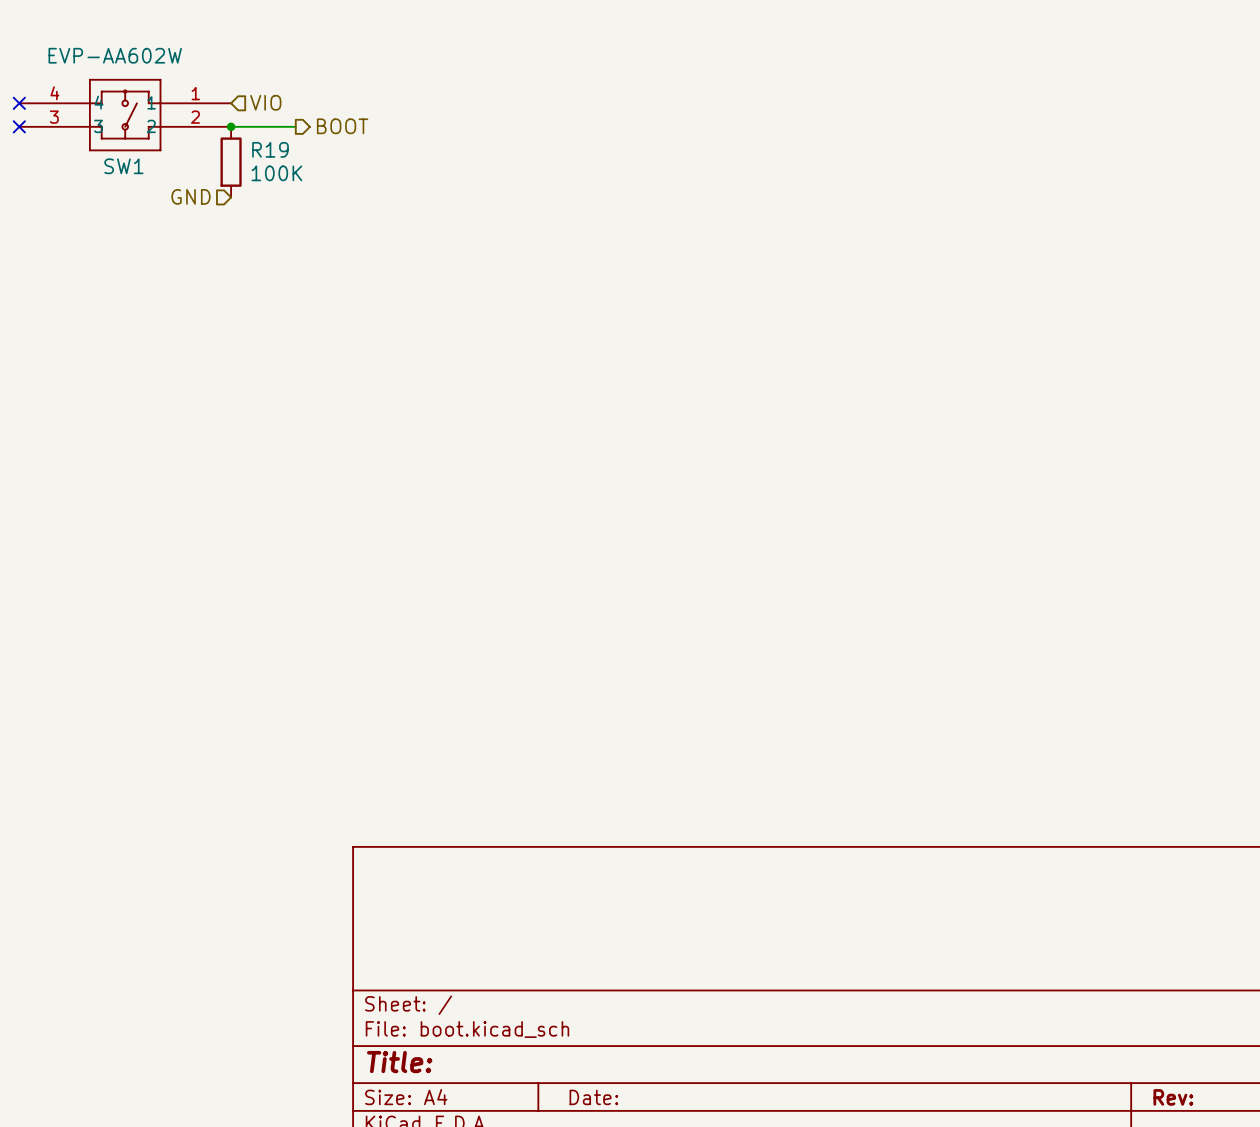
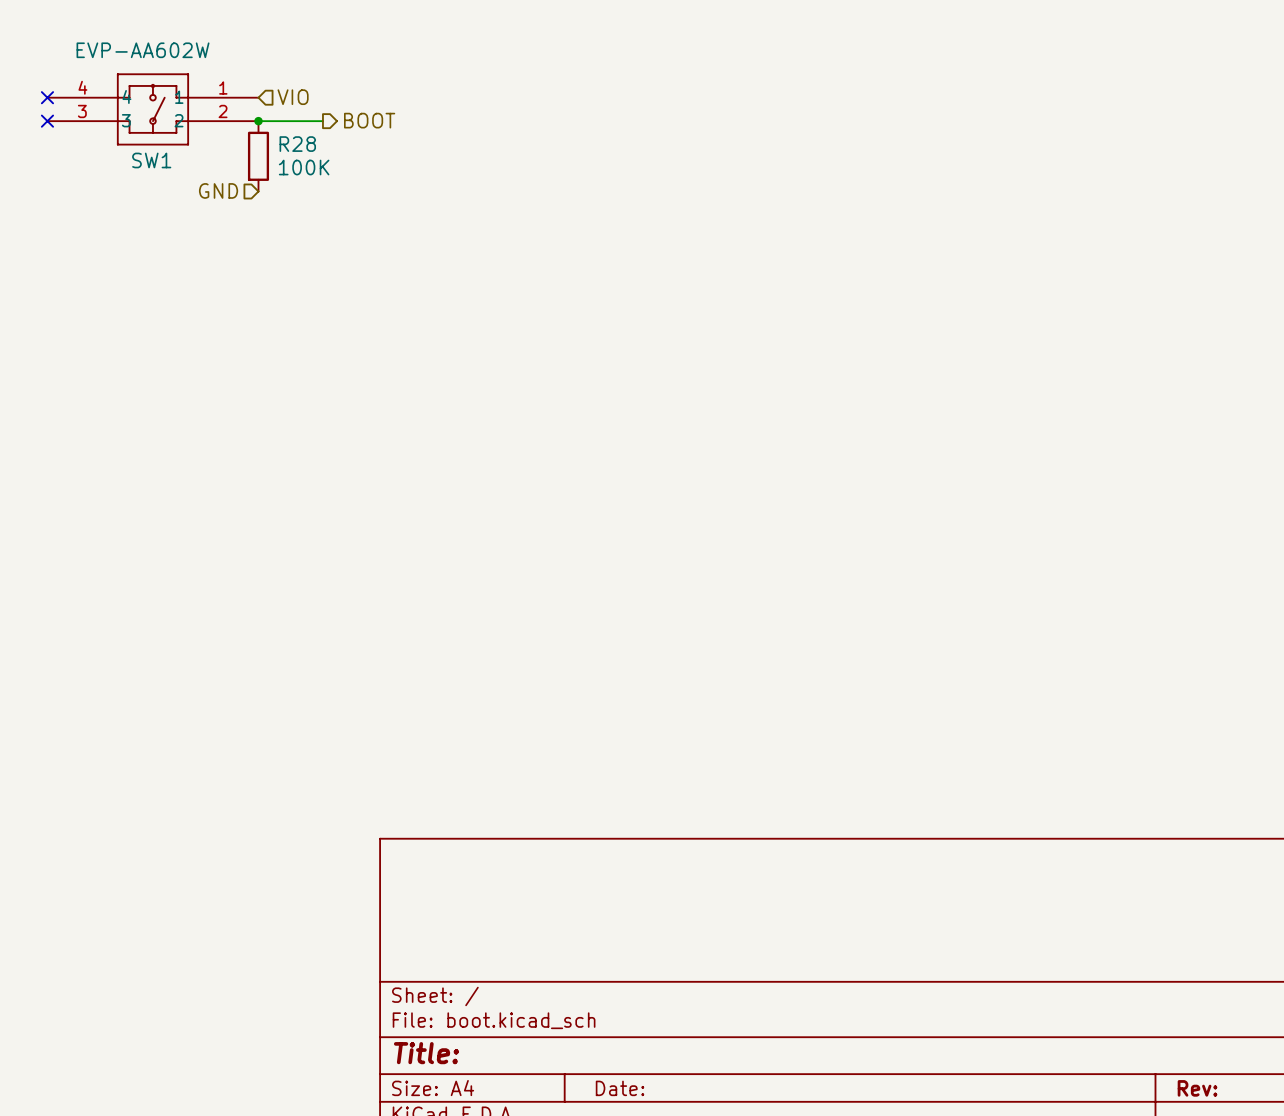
R19 name: R19 (270, 149) -> R28 (297, 144)

